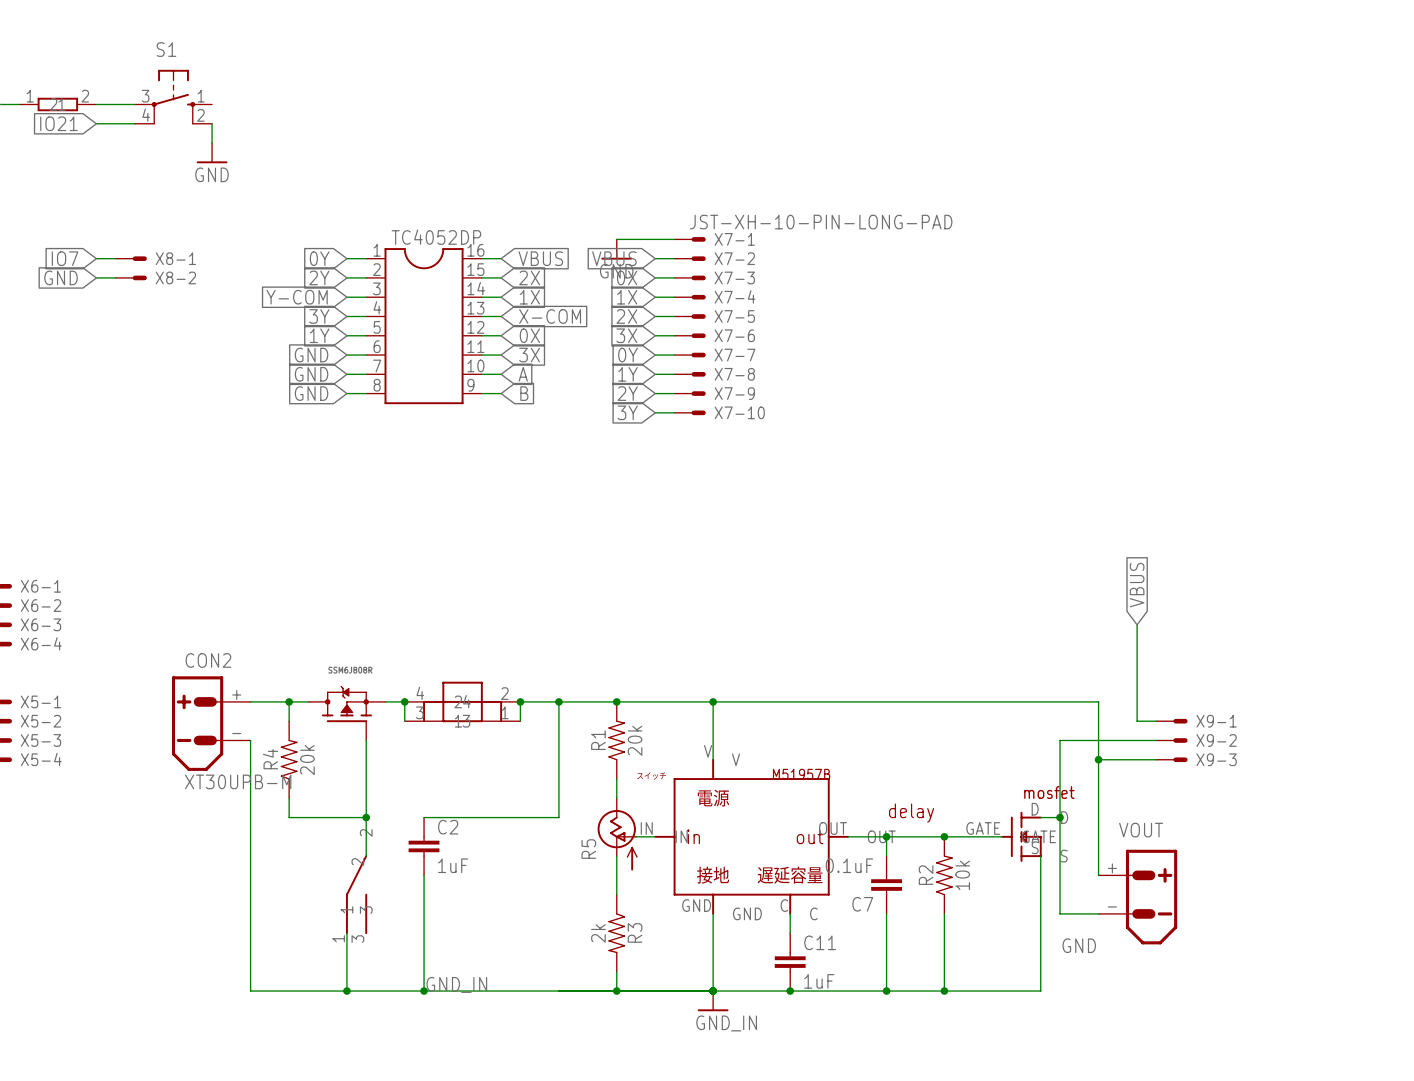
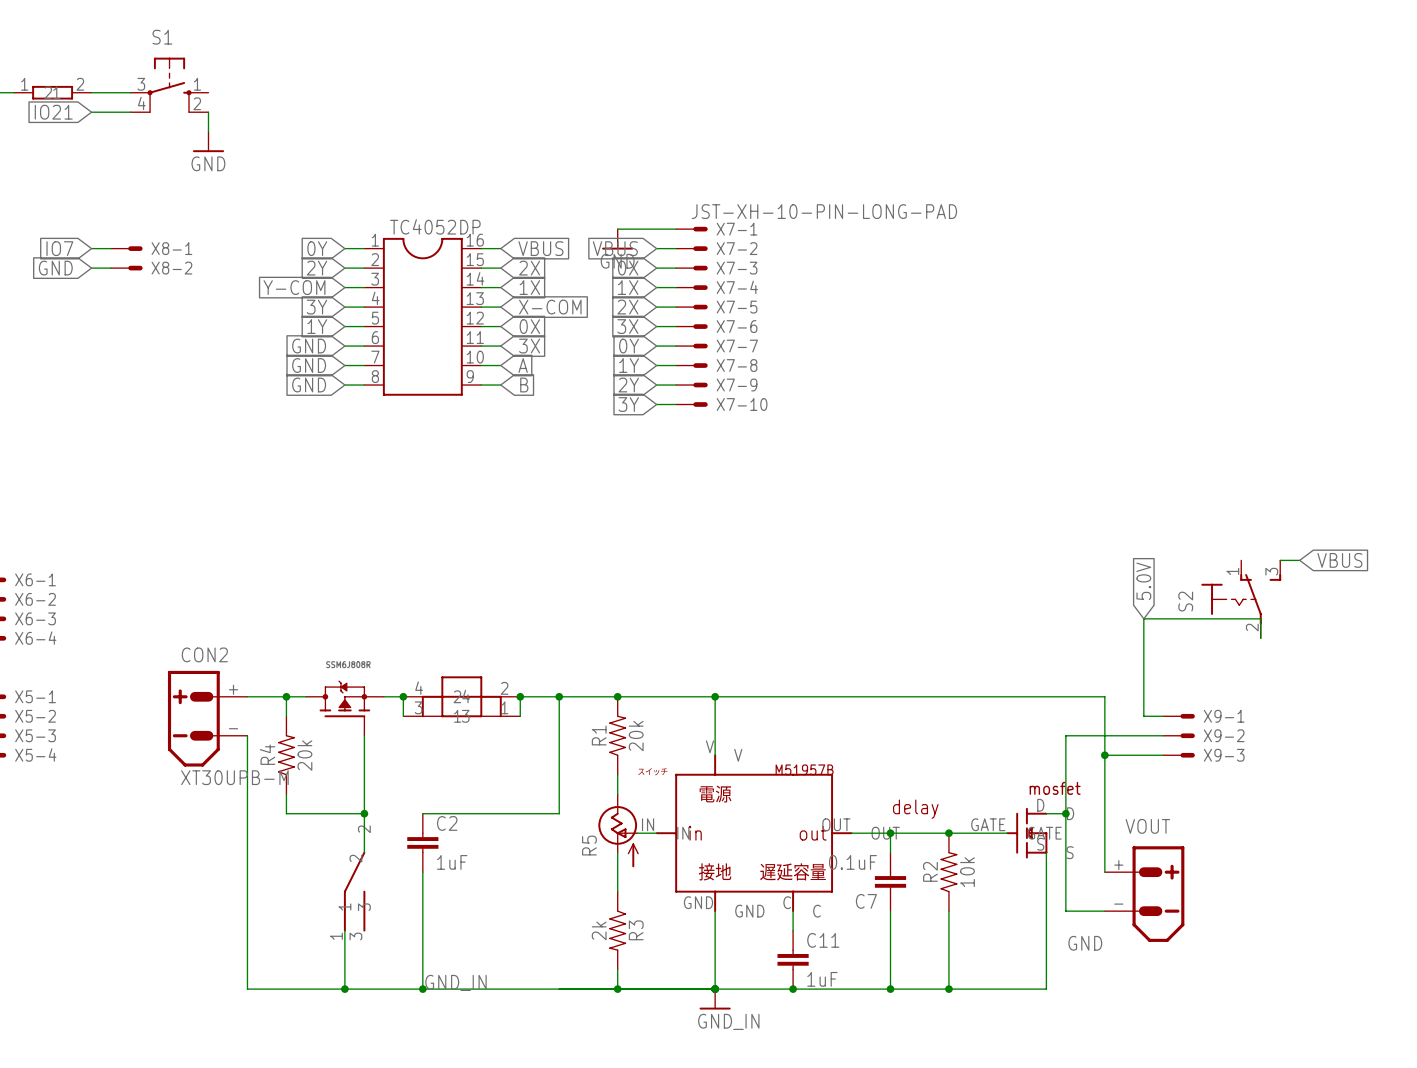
wire: none -> (1280, 560) (1299, 560)
global label: none -> VBUS (1339, 560)
global label: VBUS (1137, 585) -> 5.0V (1143, 581)
S2: none -> (1241, 599)
wire: none -> (1143, 618) (1260, 618) (1260, 638)

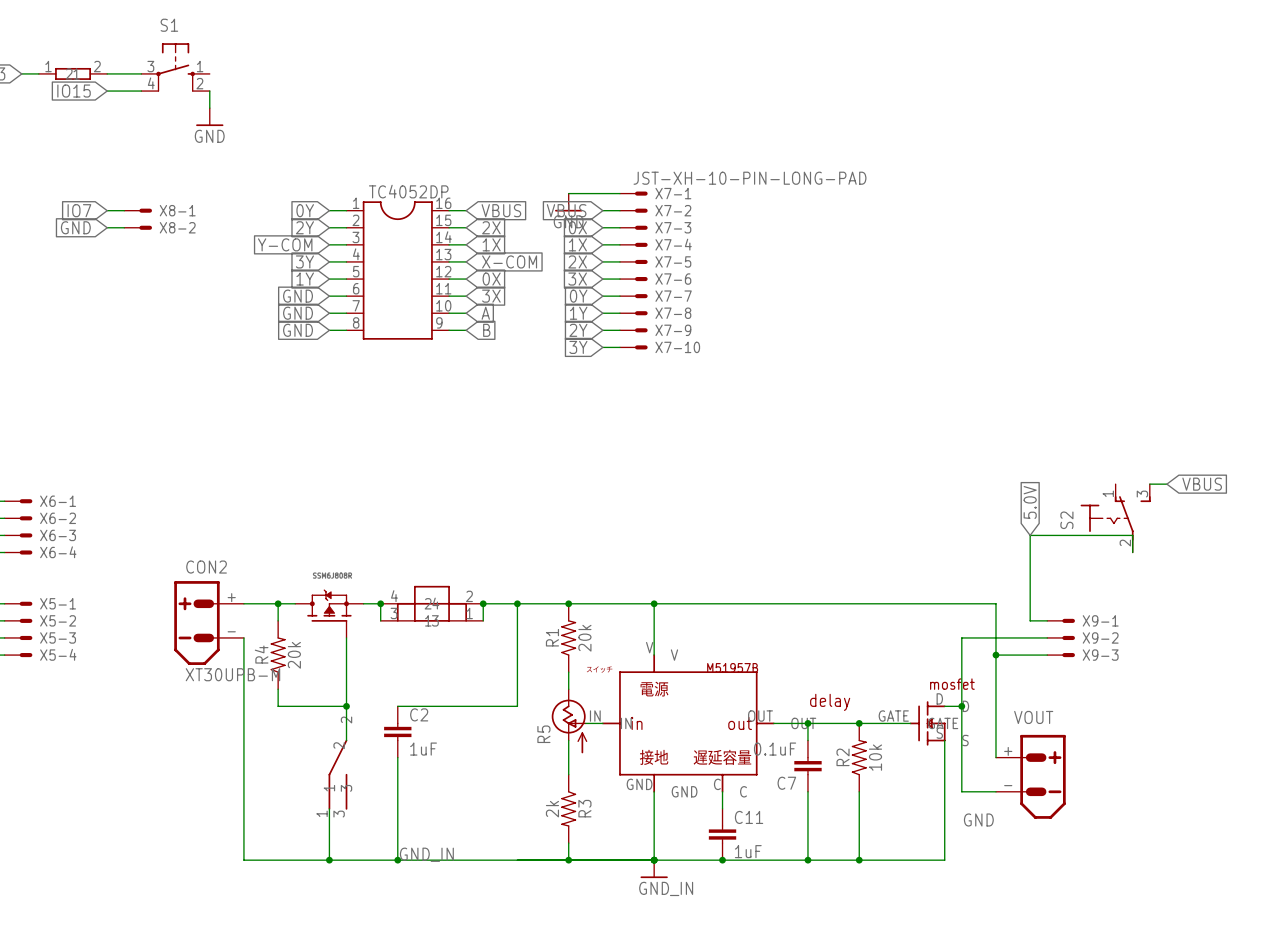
global label: IO21 (53, 112) -> IO15 (74, 91)

